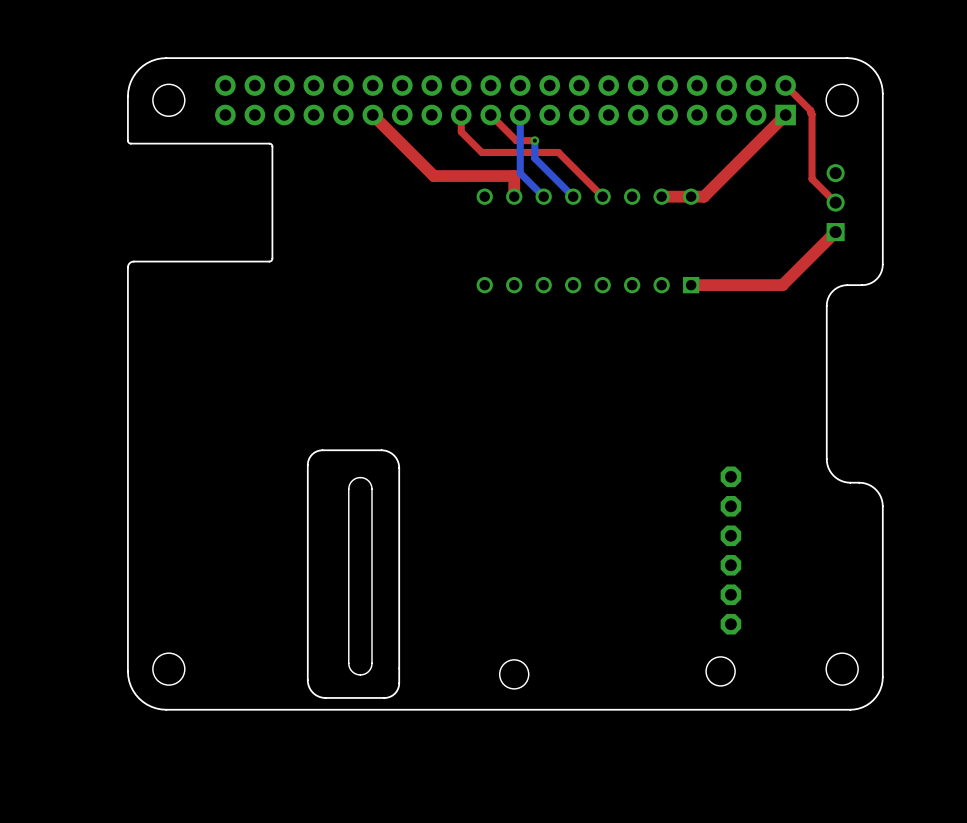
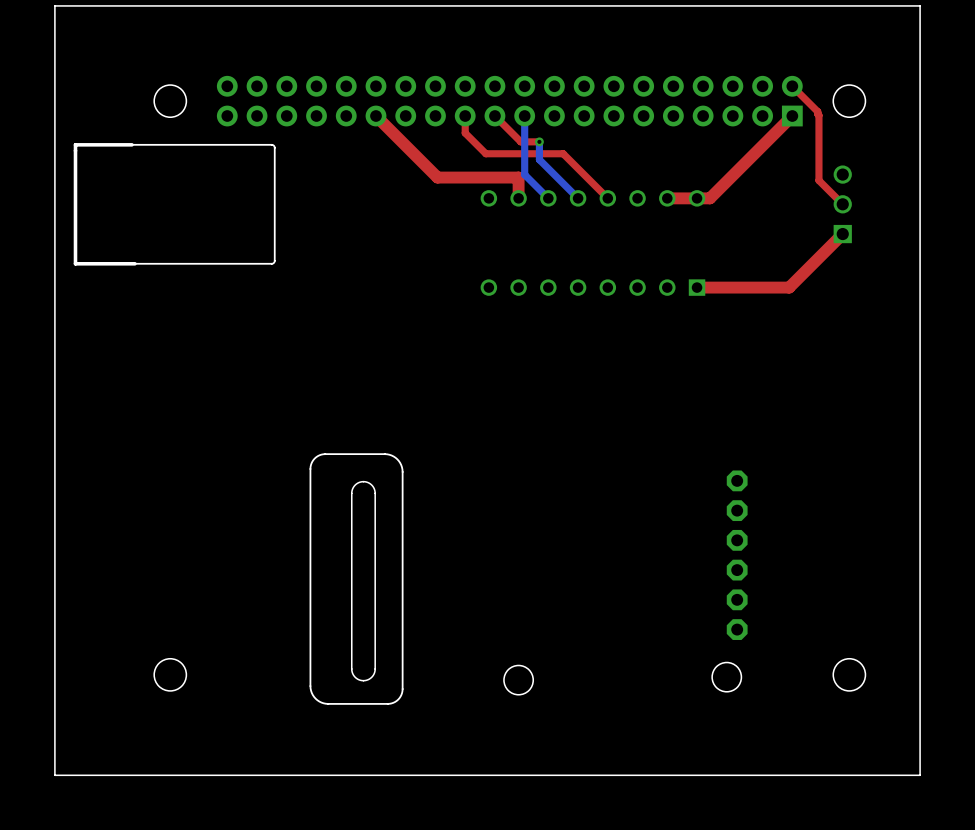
board edge: none -> (920, 5) (54, 5) (54, 775) (920, 775) (920, 5)
board edge: (130, 143) (127, 140) (127, 96) (130, 81) (142, 66) (161, 58) (847, 58) (860, 60) (868, 65) (878, 75) (882, 88) (882, 267) (878, 277) (872, 282) (864, 284) (839, 286) (831, 293) (827, 300) (826, 459) (829, 470) (836, 477) (844, 481) (868, 484) (877, 491) (881, 500) (882, 677) (878, 693) (866, 705) (850, 709) (166, 709) (147, 704) (133, 690) (127, 671) (127, 267) (129, 263) (133, 261) -> (132, 144) (75, 144) (75, 263) (134, 263)

